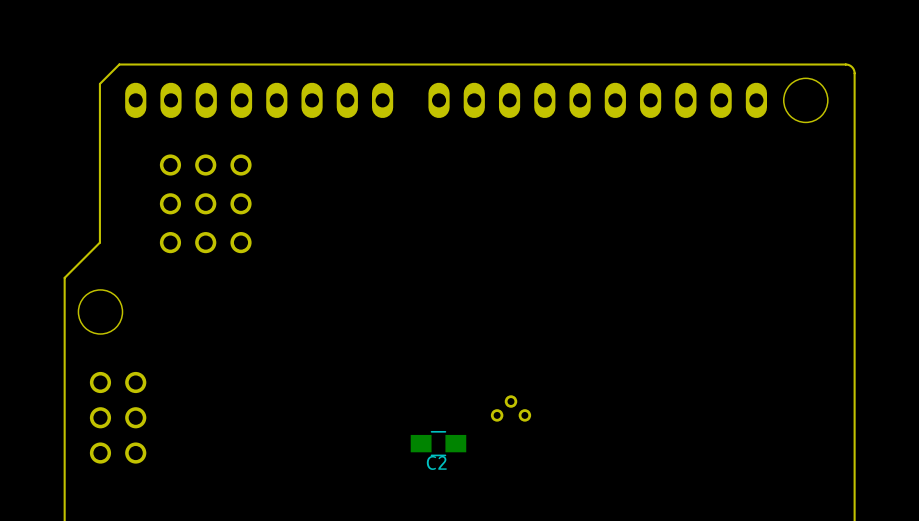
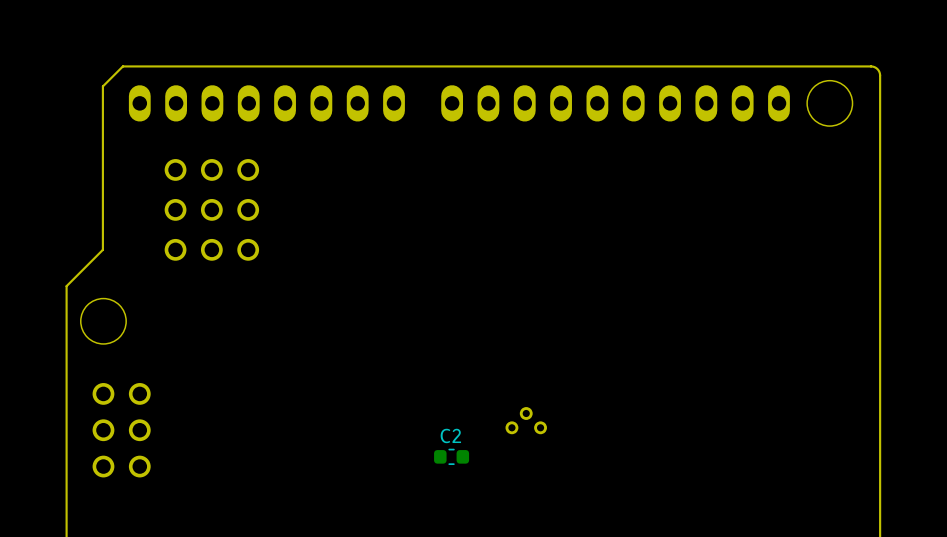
C2 footprint: [410, 430, 467, 457] -> [434, 448, 470, 466]
C2 name position: C2 (436, 462) -> C2 (450, 435)

